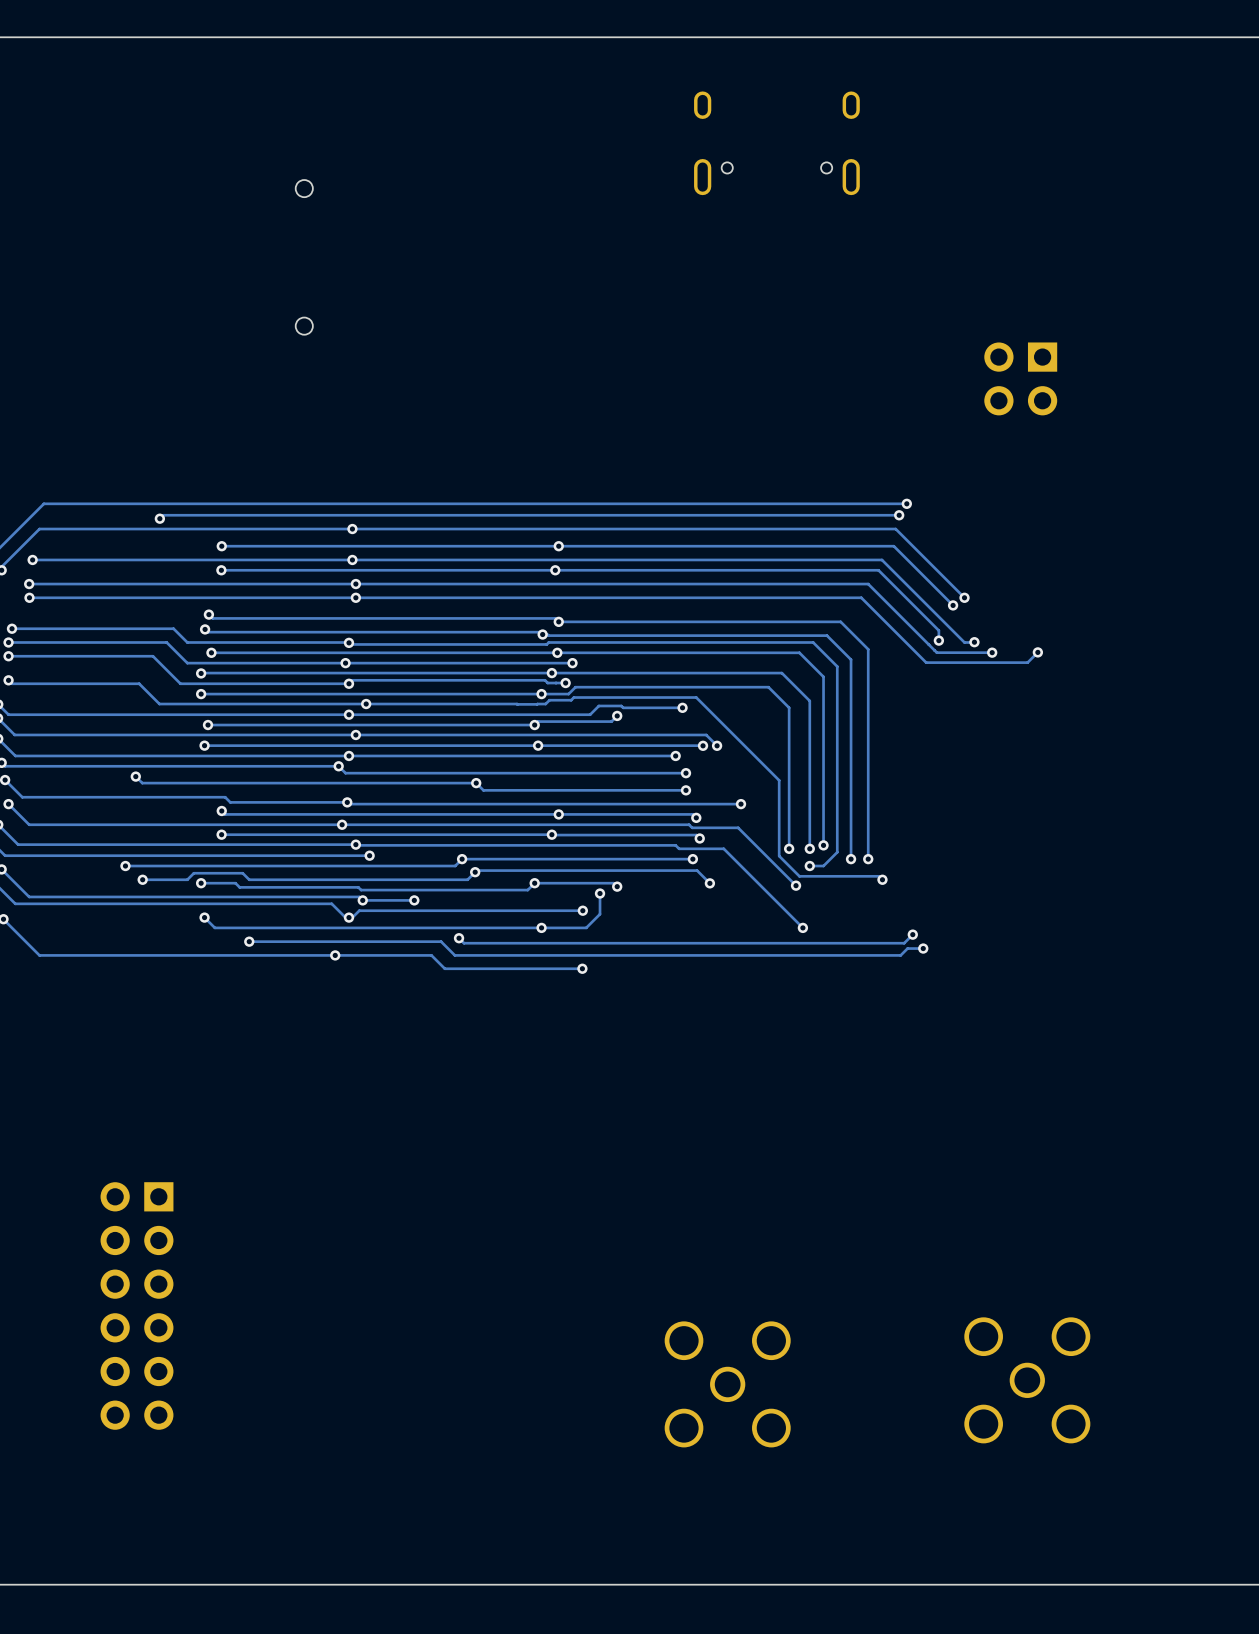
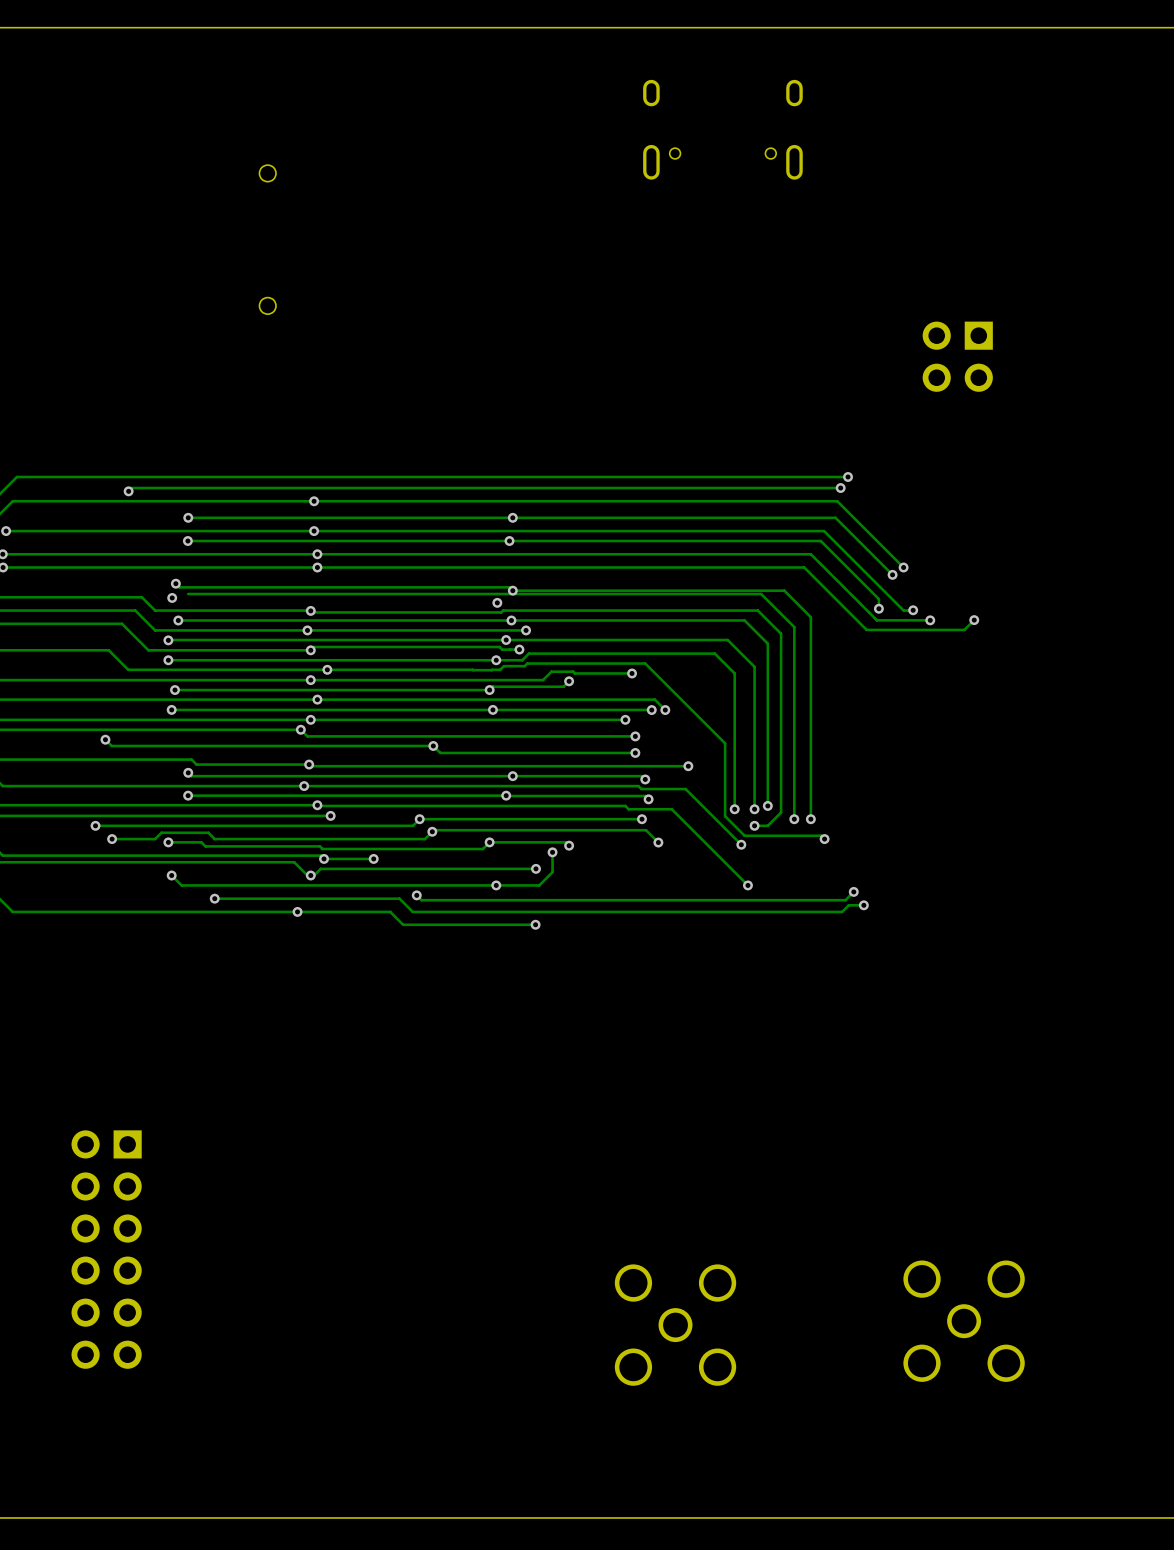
track: (205, 629) (207, 632) (540, 632) (548, 635) (826, 635) -> (188, 594) (761, 594) (771, 603)

